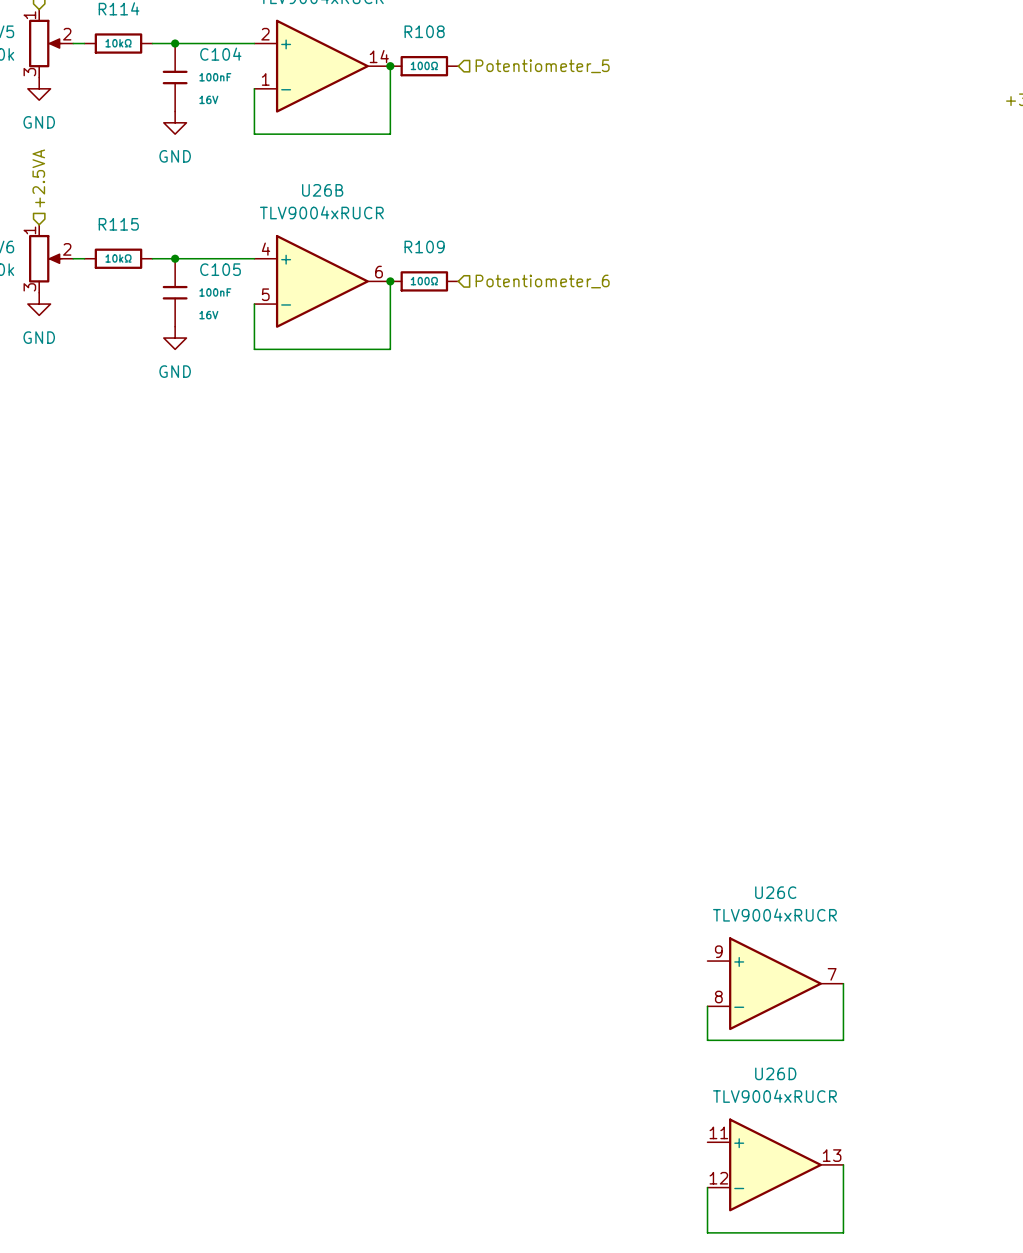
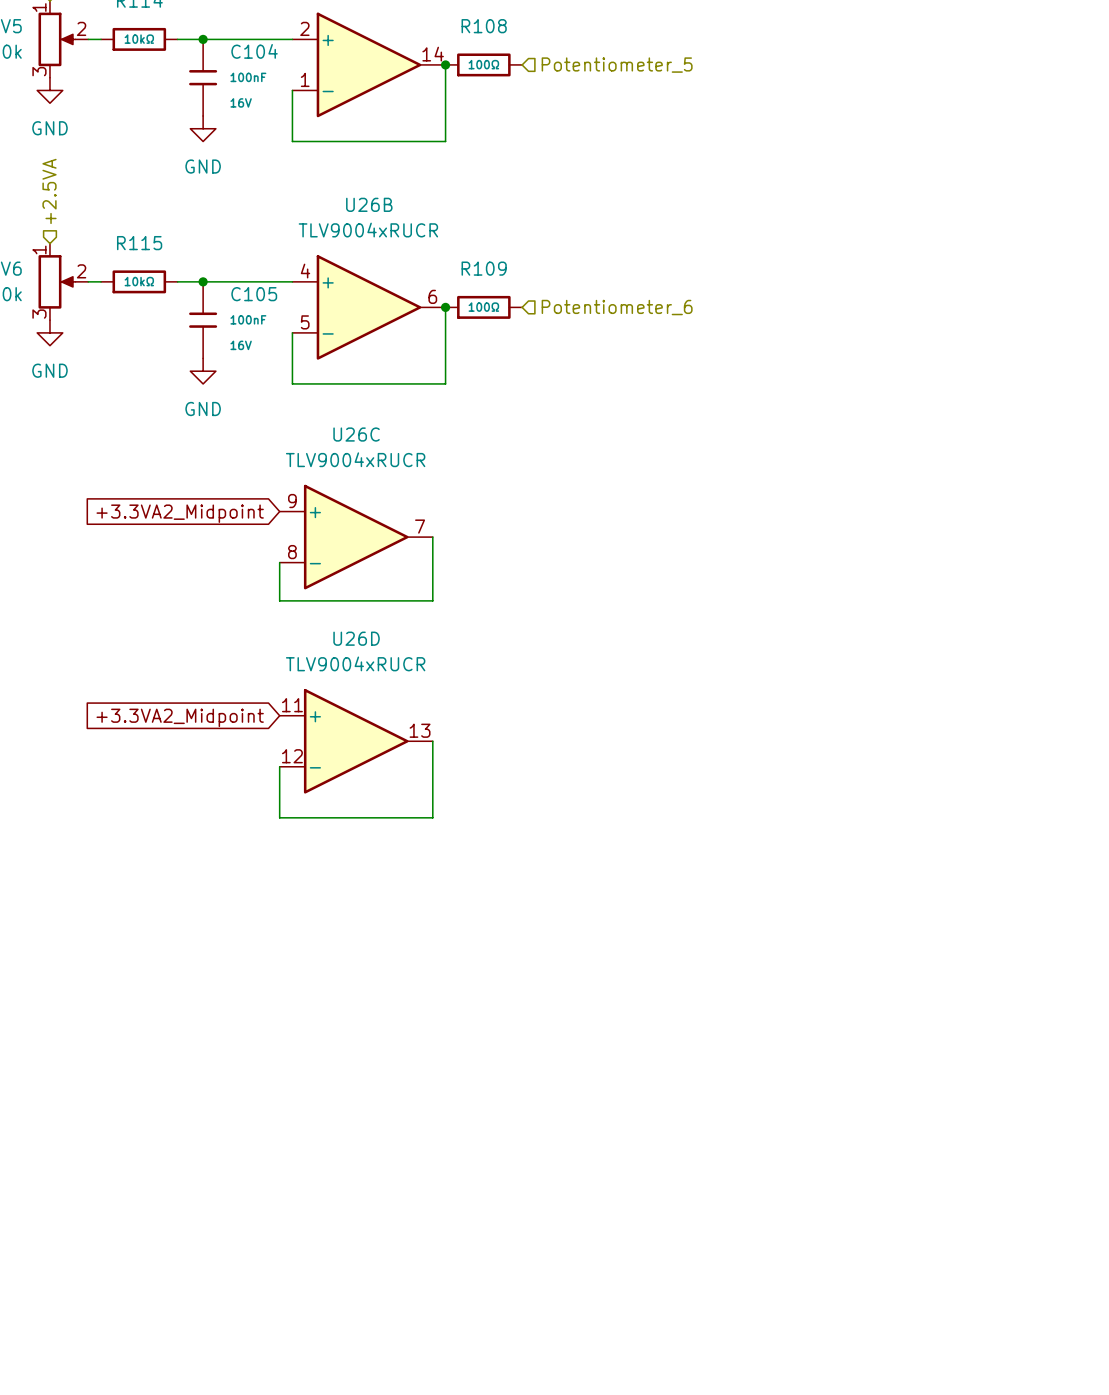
global label: none -> +3.3VA2_Midpoint (180, 513)
wire: none -> (432, 537) (432, 600) (279, 600) (279, 562)
global label: none -> +3.3VA2_Midpoint (180, 717)
wire: none -> (432, 741) (432, 817) (279, 817) (279, 766)
U26C position: (775, 983) -> (356, 537)
wire: (843, 983) (843, 1040) (707, 1040) (707, 1006) -> none
U26D position: (775, 1164) -> (356, 741)
wire: (843, 1164) (843, 1232) (707, 1232) (707, 1187) -> none

